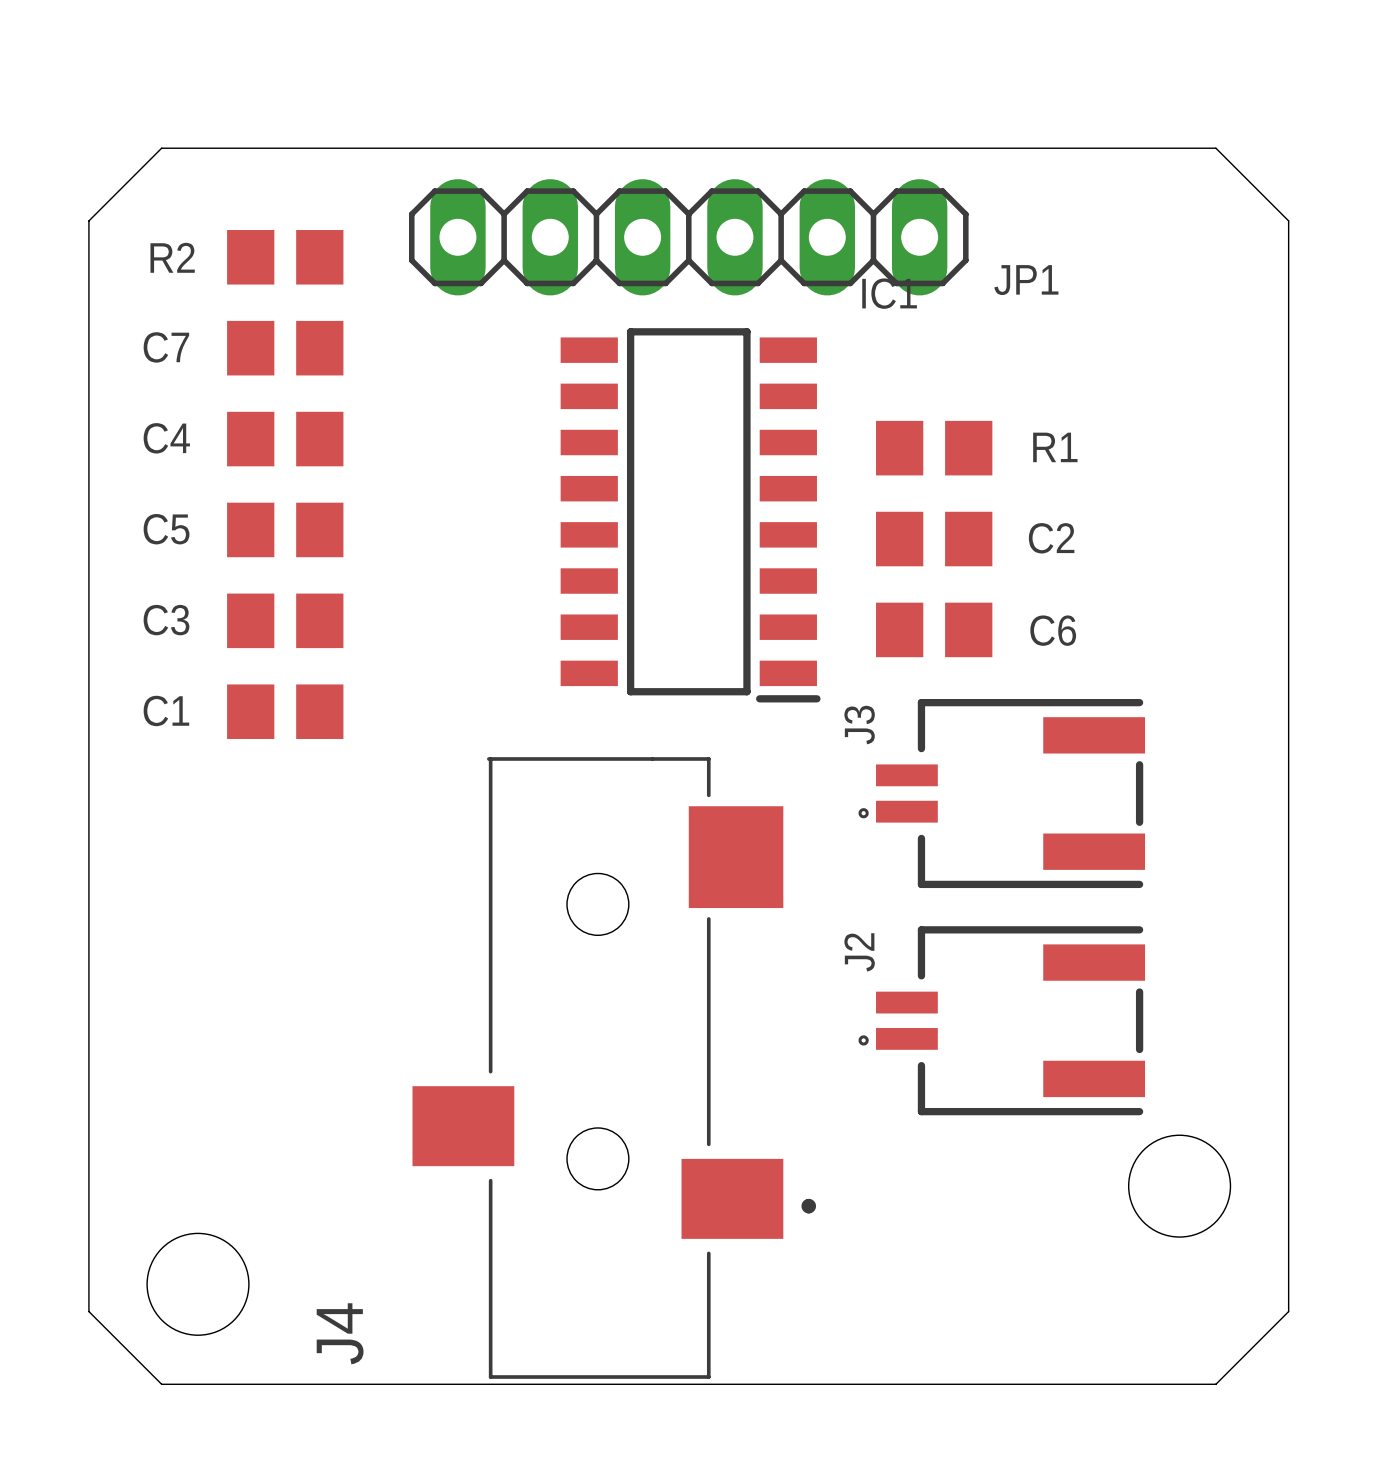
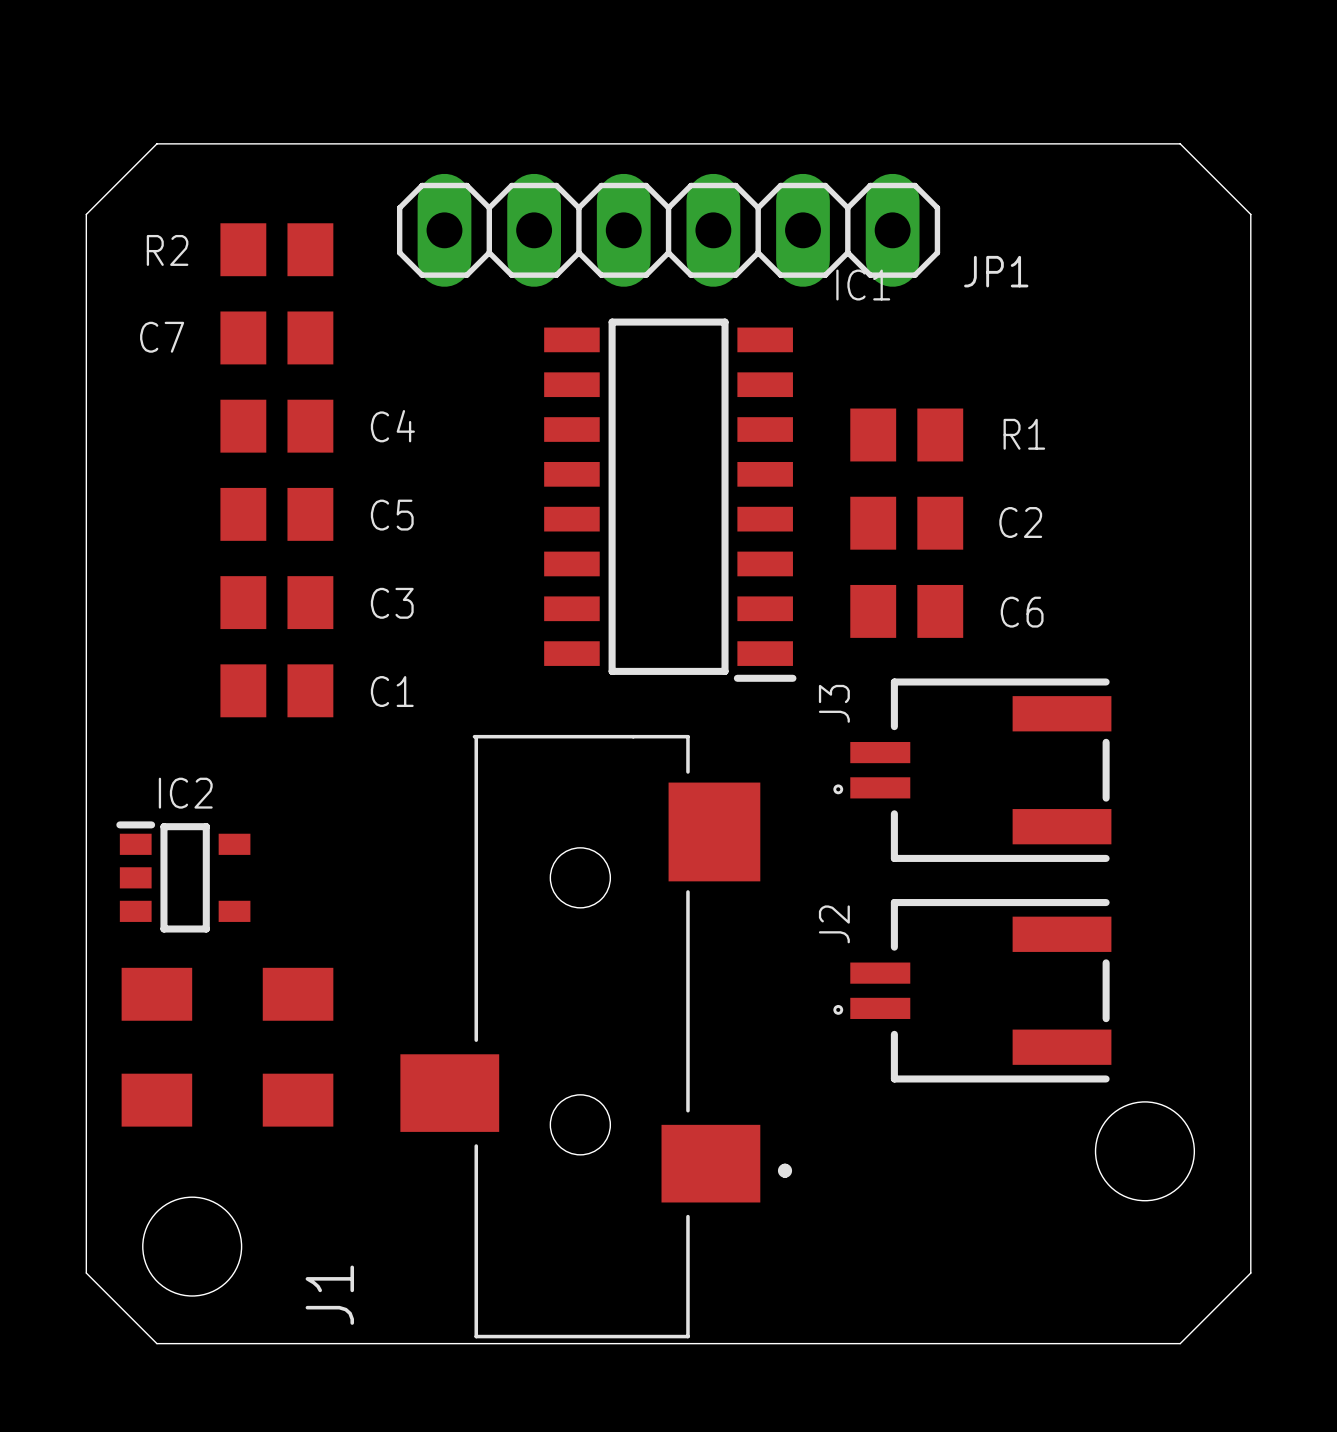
C4 name position: C4 (166, 438) -> C4 (392, 426)
C5 name position: C5 (166, 529) -> C5 (392, 515)
C3 name position: C3 (166, 620) -> C3 (392, 603)
C1 name position: C1 (166, 710) -> C1 (392, 691)
IC2: none -> (183, 876)
part: none -> (156, 1047)
part: none -> (298, 1047)
J4 name: J4 (340, 1333) -> J1 (329, 1295)

